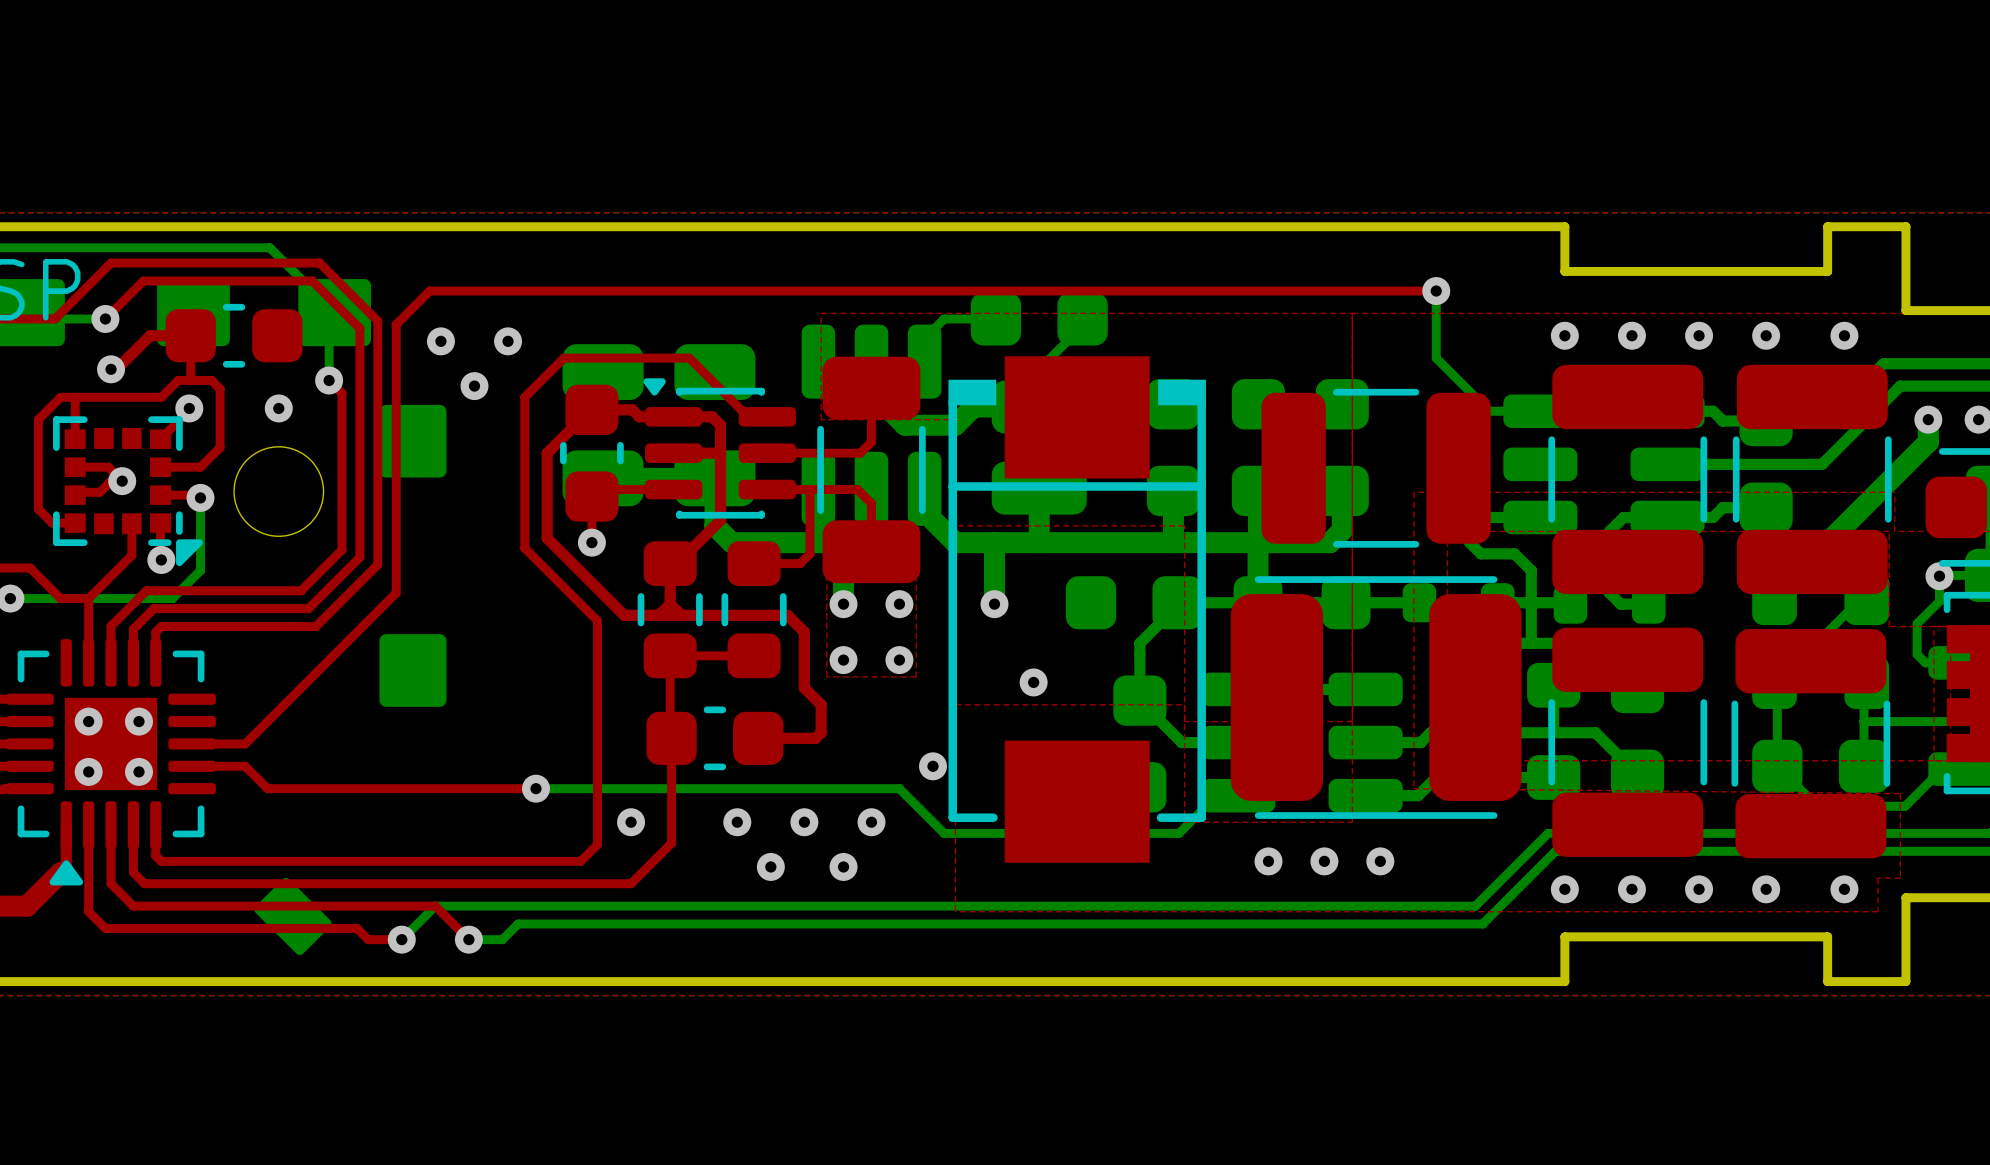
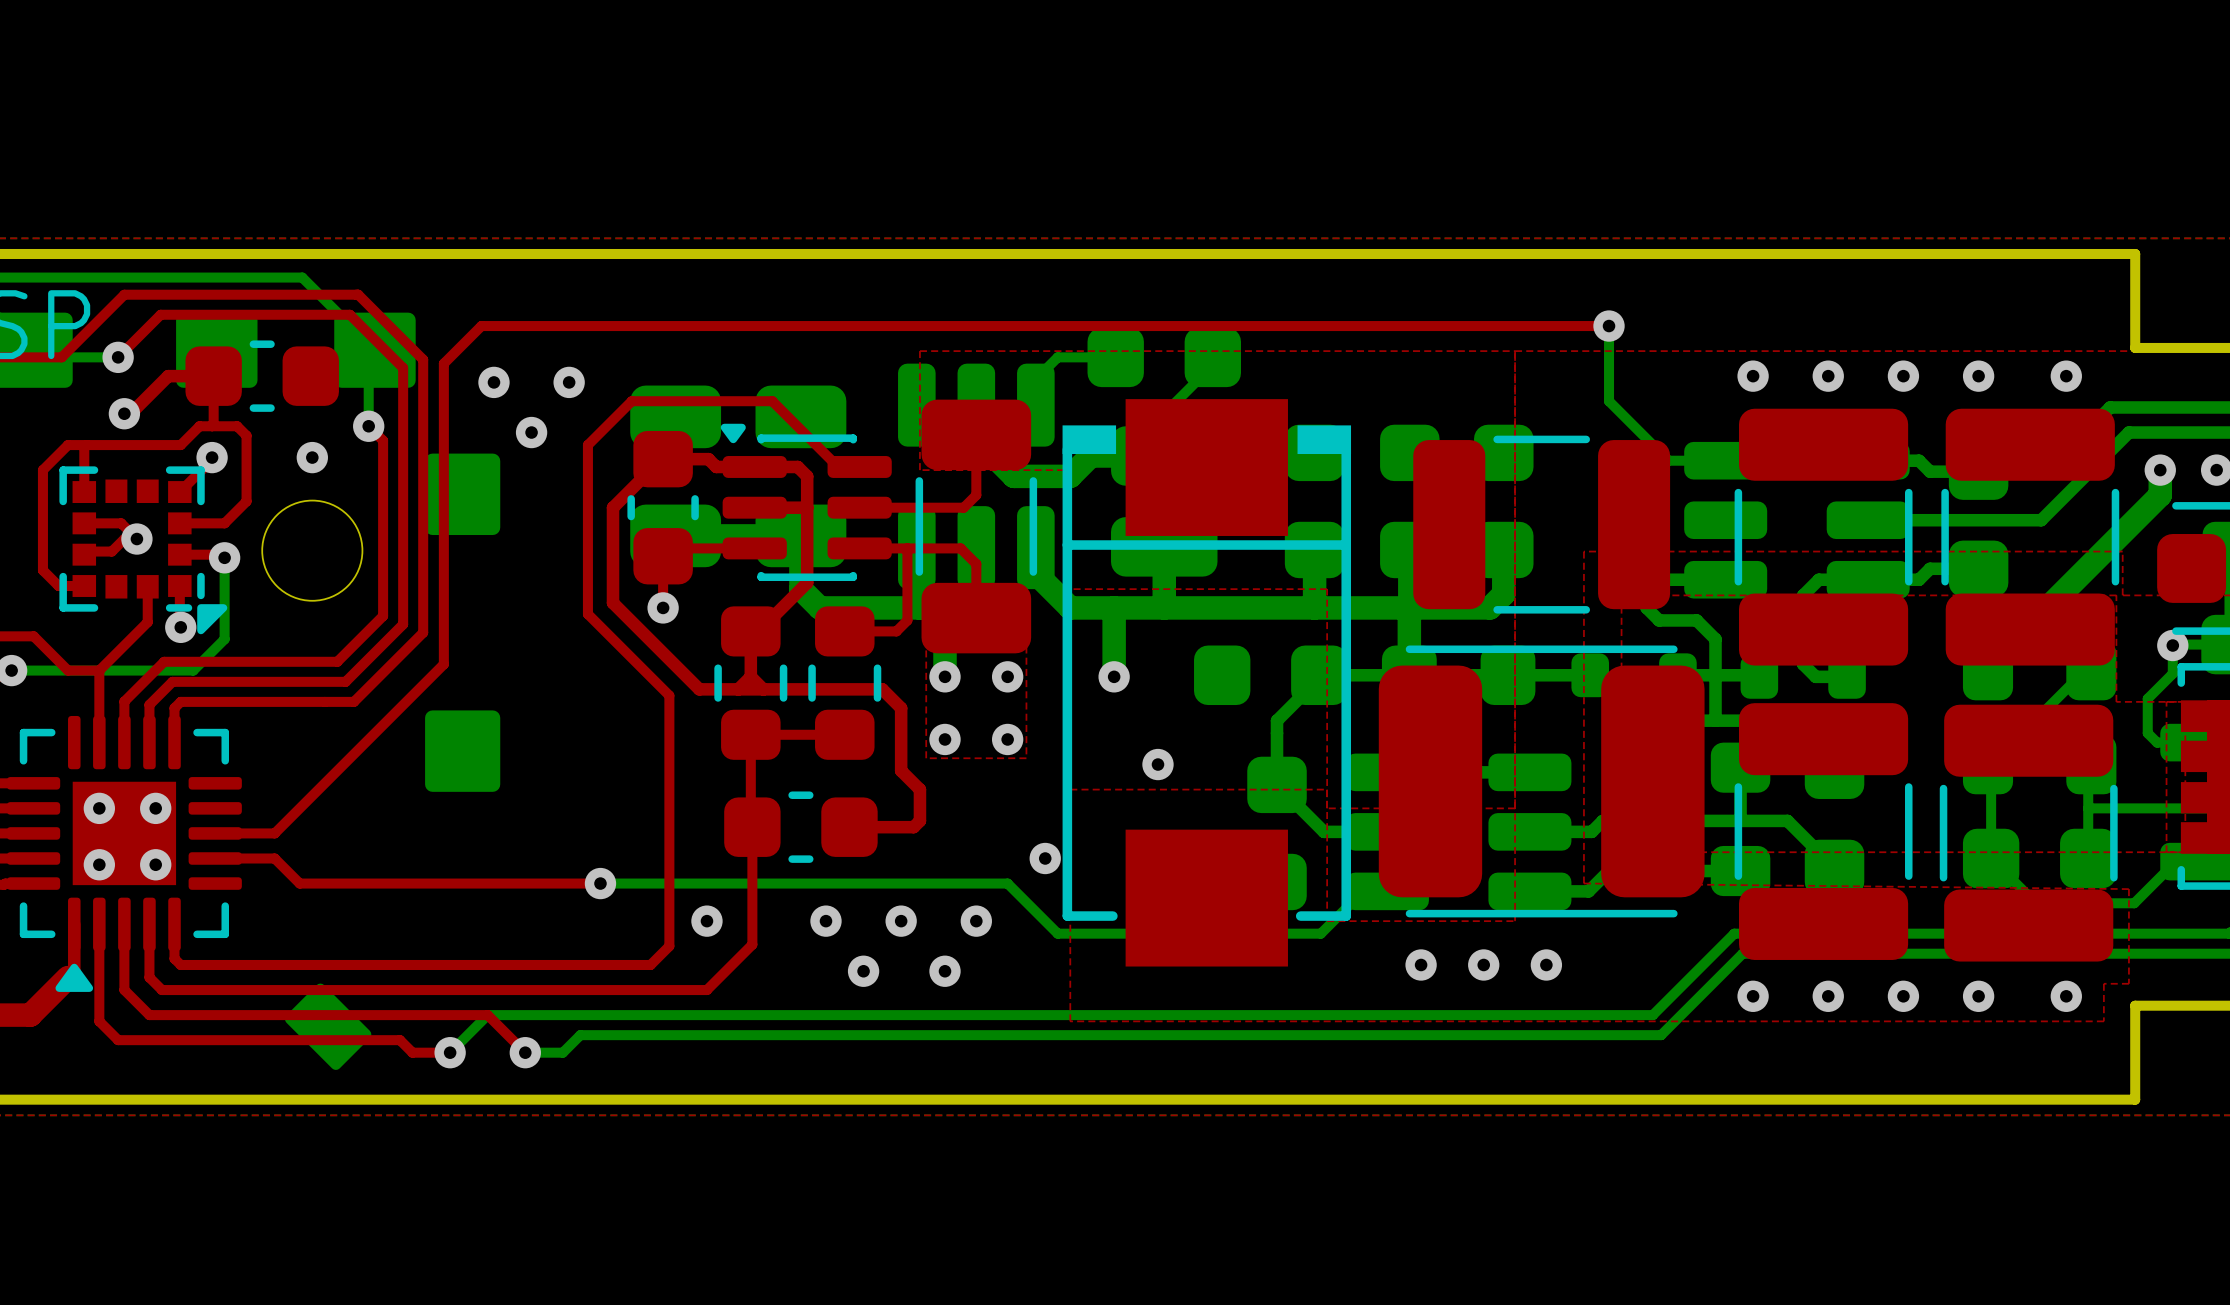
board edge: (1564, 226) (1564, 271) (1827, 271) (1827, 226) -> (1753, 254) (2047, 254)
board edge: (1564, 981) (1564, 936) (1827, 936) (1827, 981) -> (1753, 1099) (2047, 1099)

